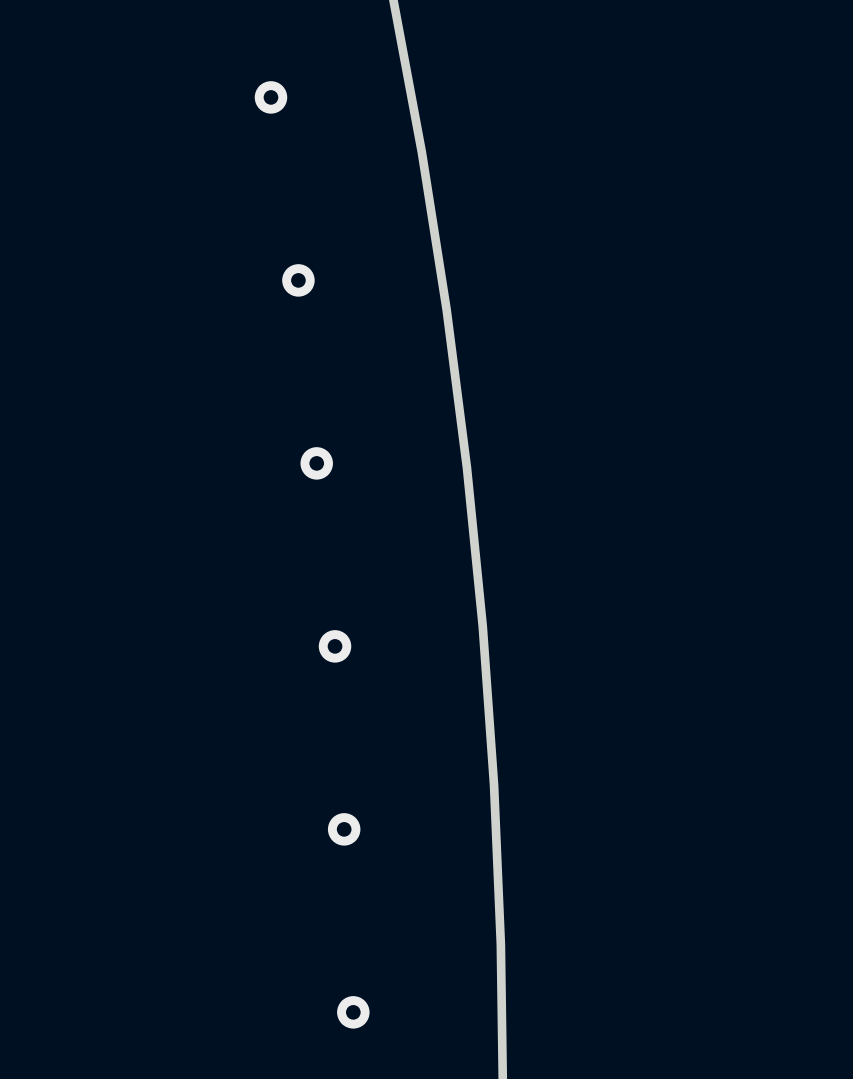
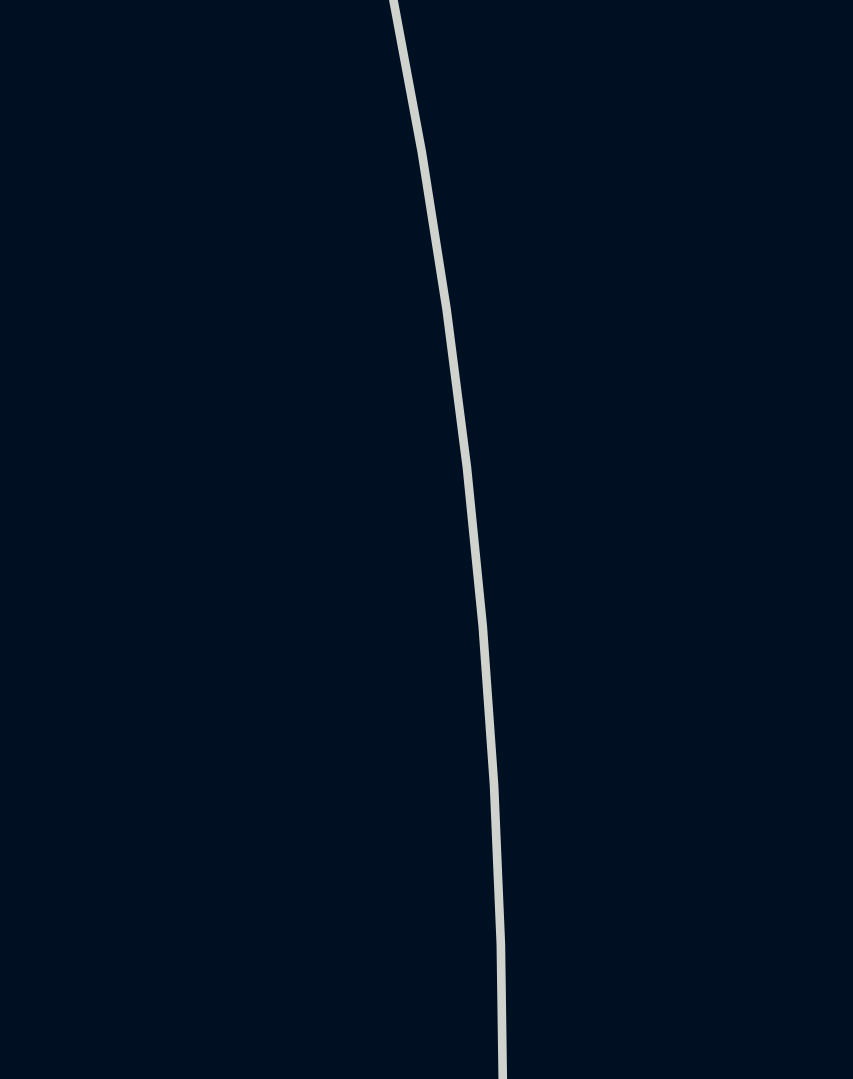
via: (270, 97) -> none
via: (298, 280) -> none
via: (316, 463) -> none
via: (335, 646) -> none
via: (344, 829) -> none
via: (353, 1012) -> none

